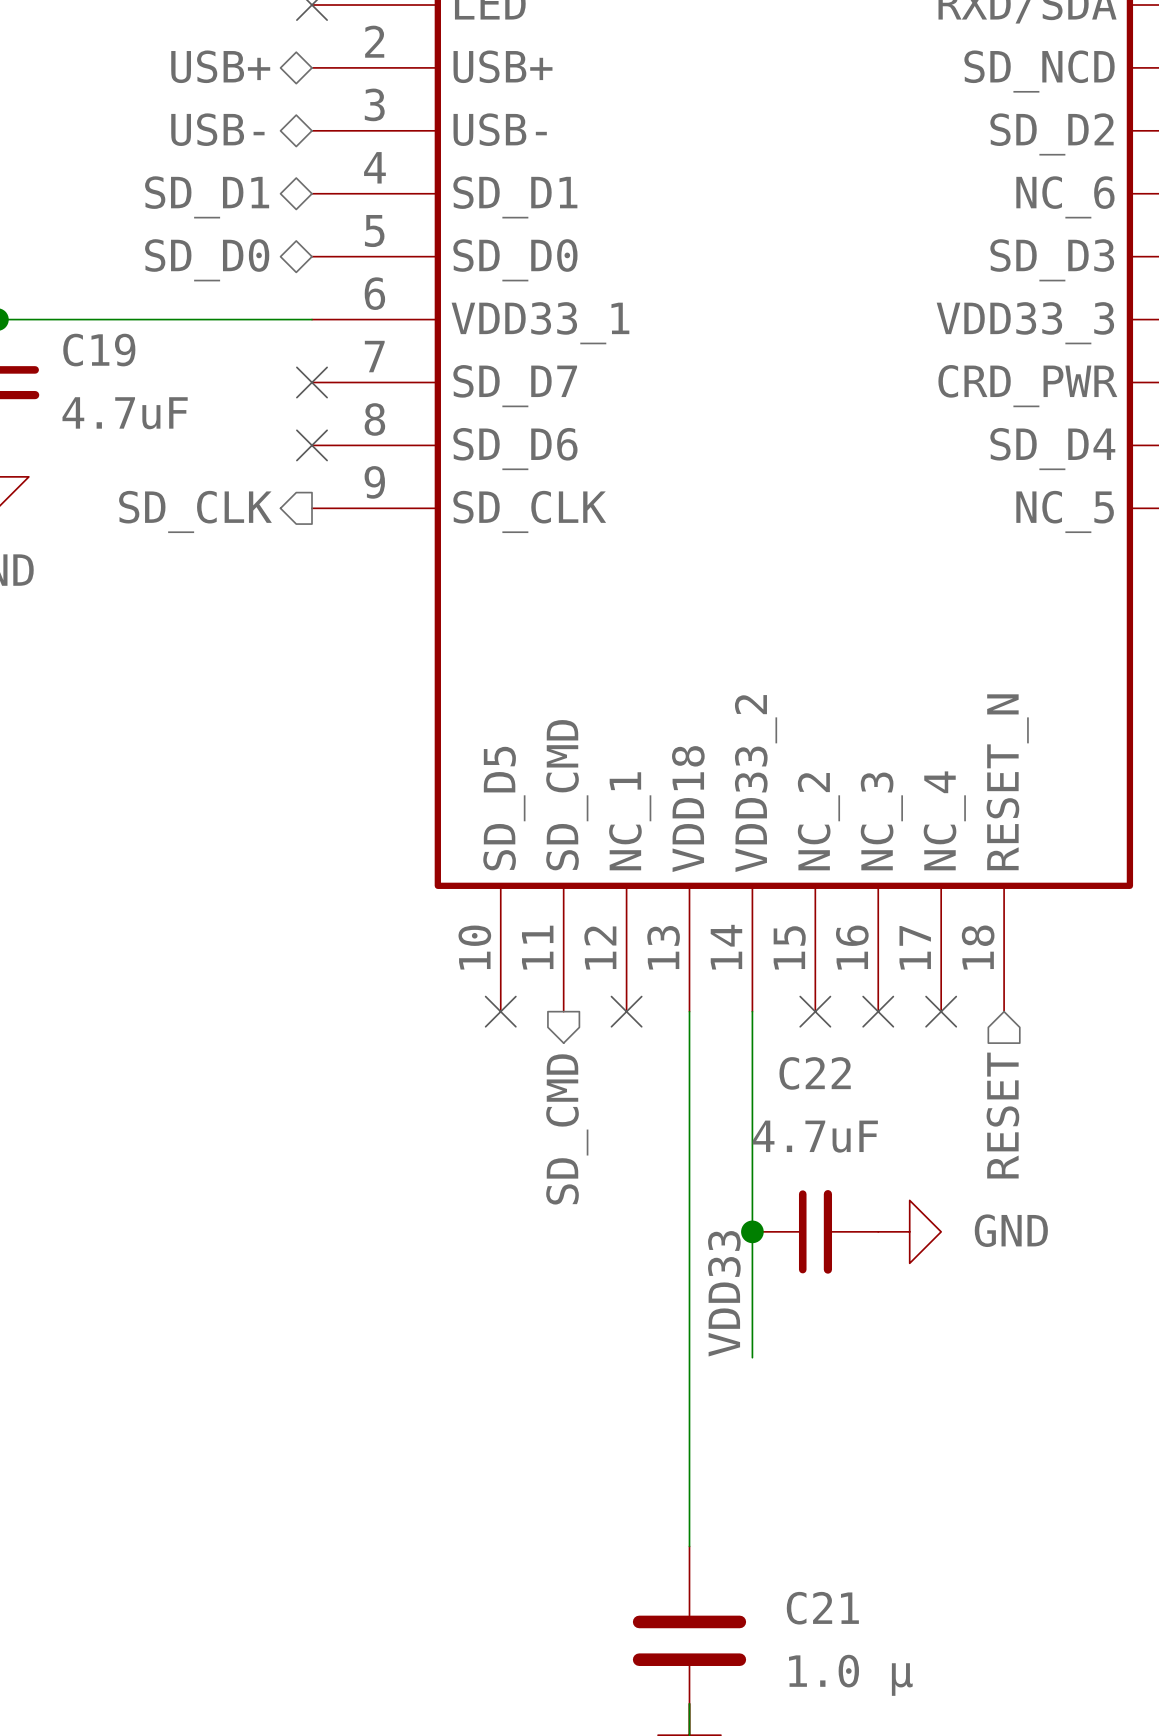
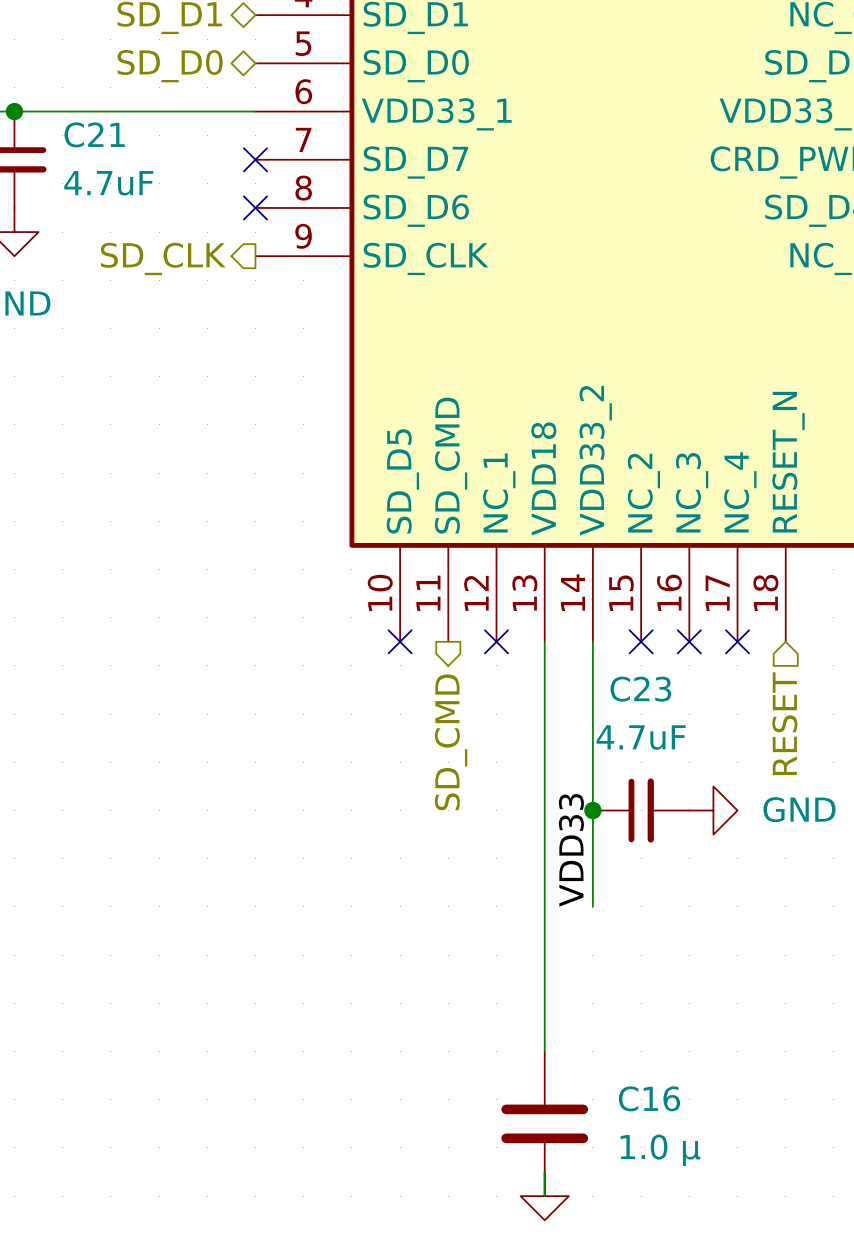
C19 name: C19 (99, 350) -> C21 (94, 134)
C22 name: C22 (815, 1073) -> C23 (640, 689)
C21 name: C21 (822, 1608) -> C16 (649, 1098)

